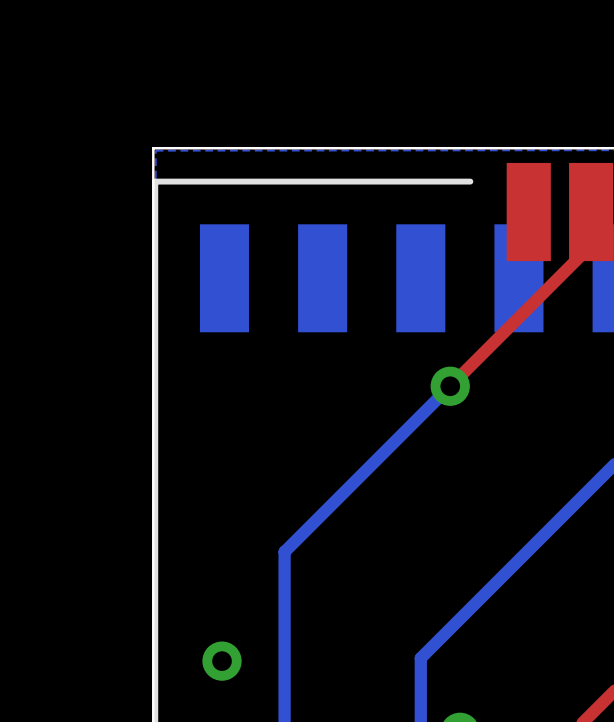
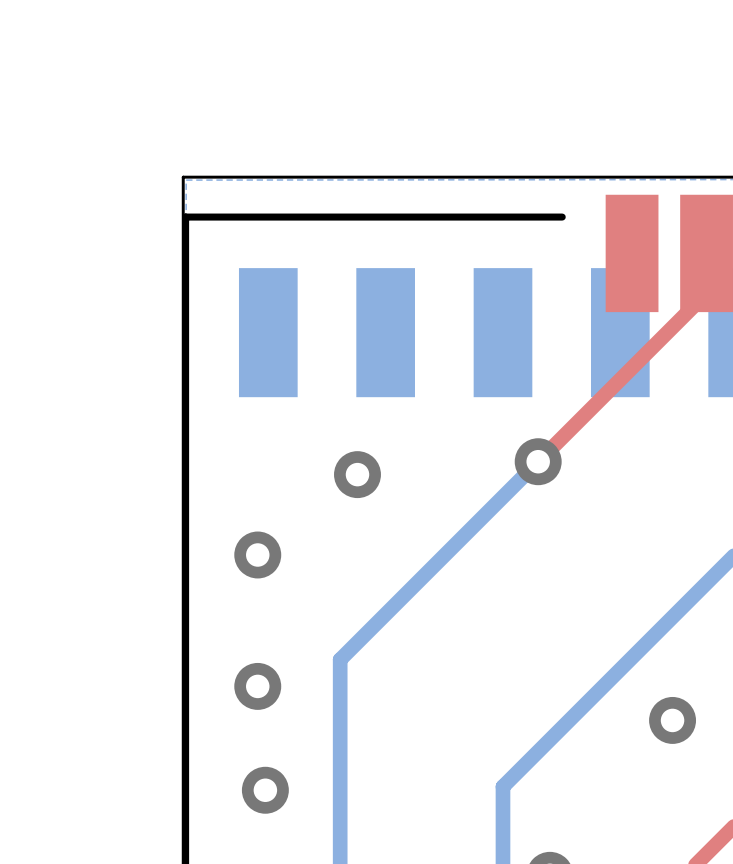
via: none -> (357, 474)
via: none -> (257, 554)
via: none -> (257, 686)
via: none -> (672, 720)

